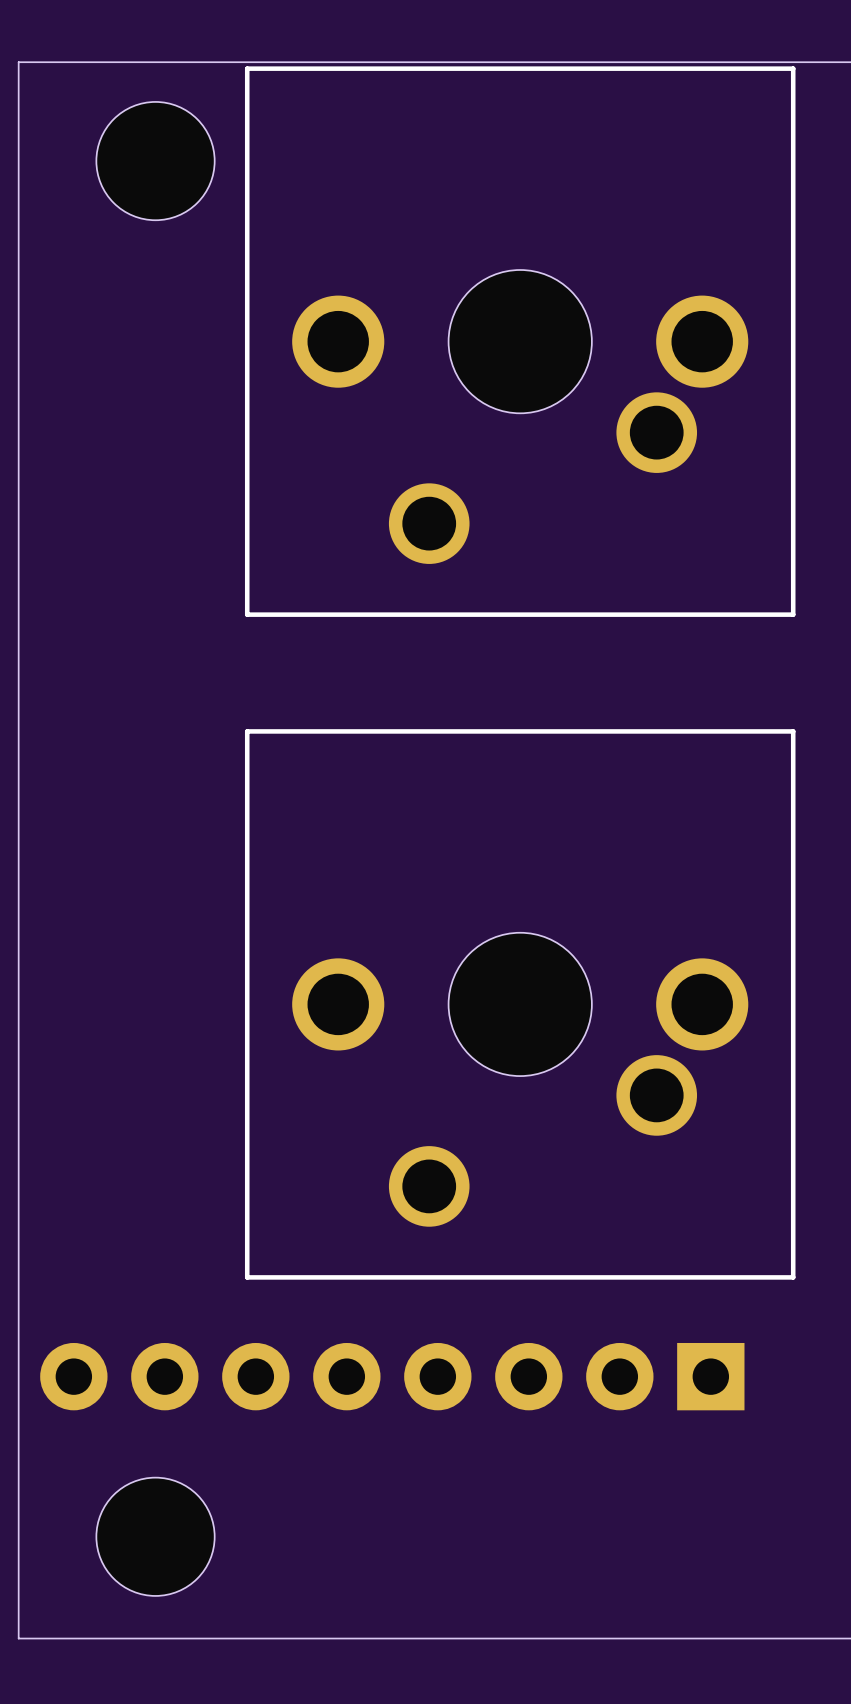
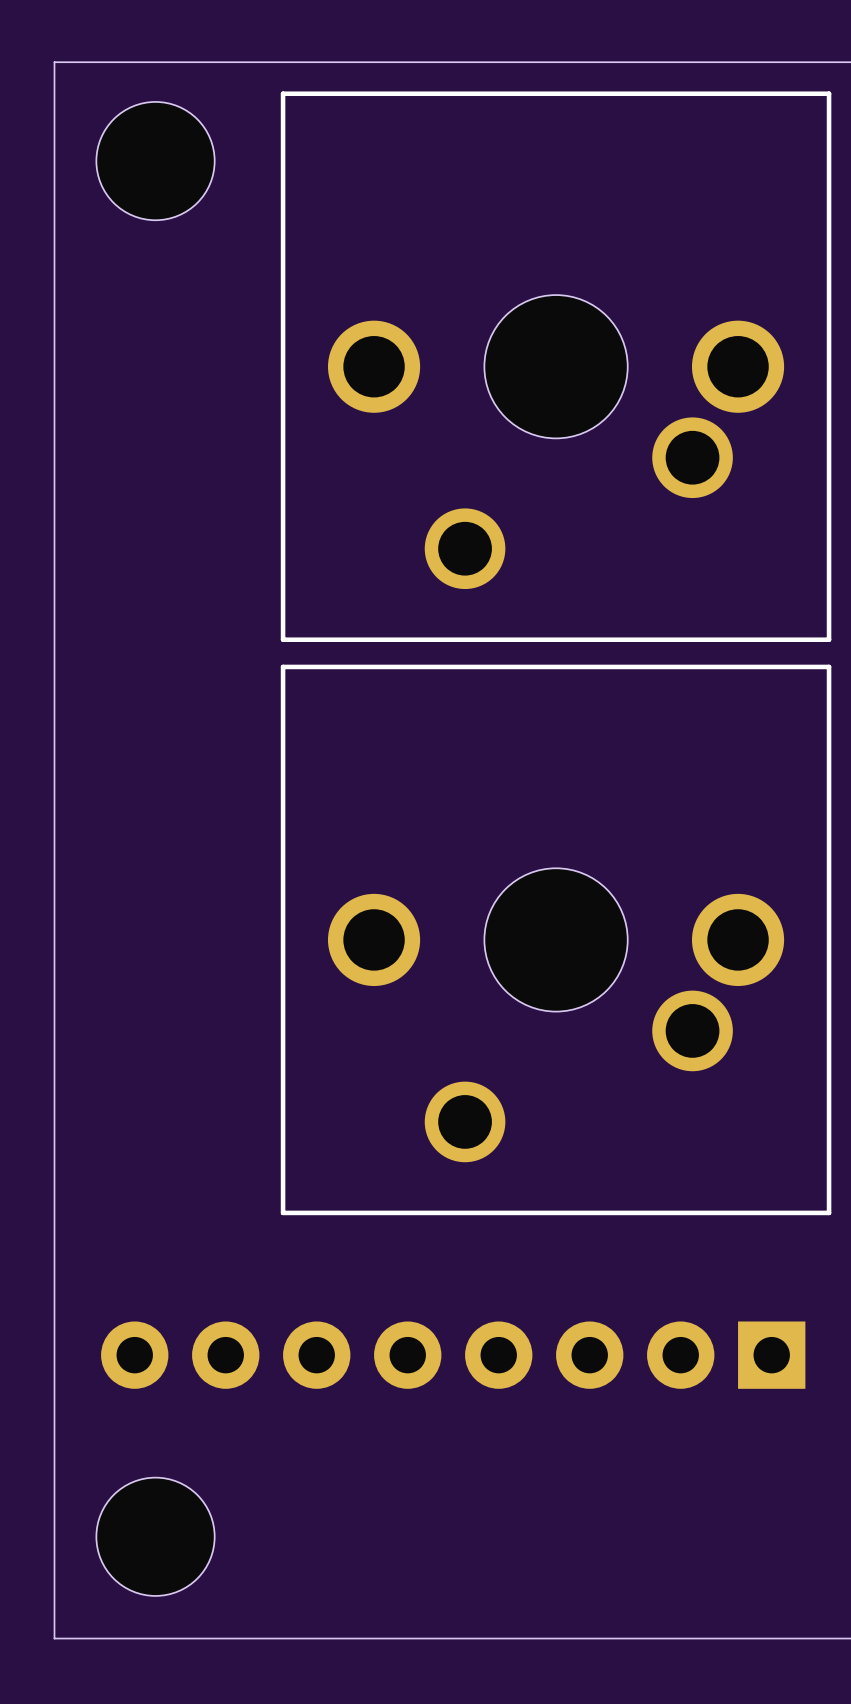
board edge: (54, 62) (18, 62) (18, 1638) (54, 1638) -> (54, 62) (54, 1638)
part position: (520, 341) -> (556, 366)
part position: (520, 1004) -> (556, 939)
part position: (392, 1376) -> (453, 1355)

